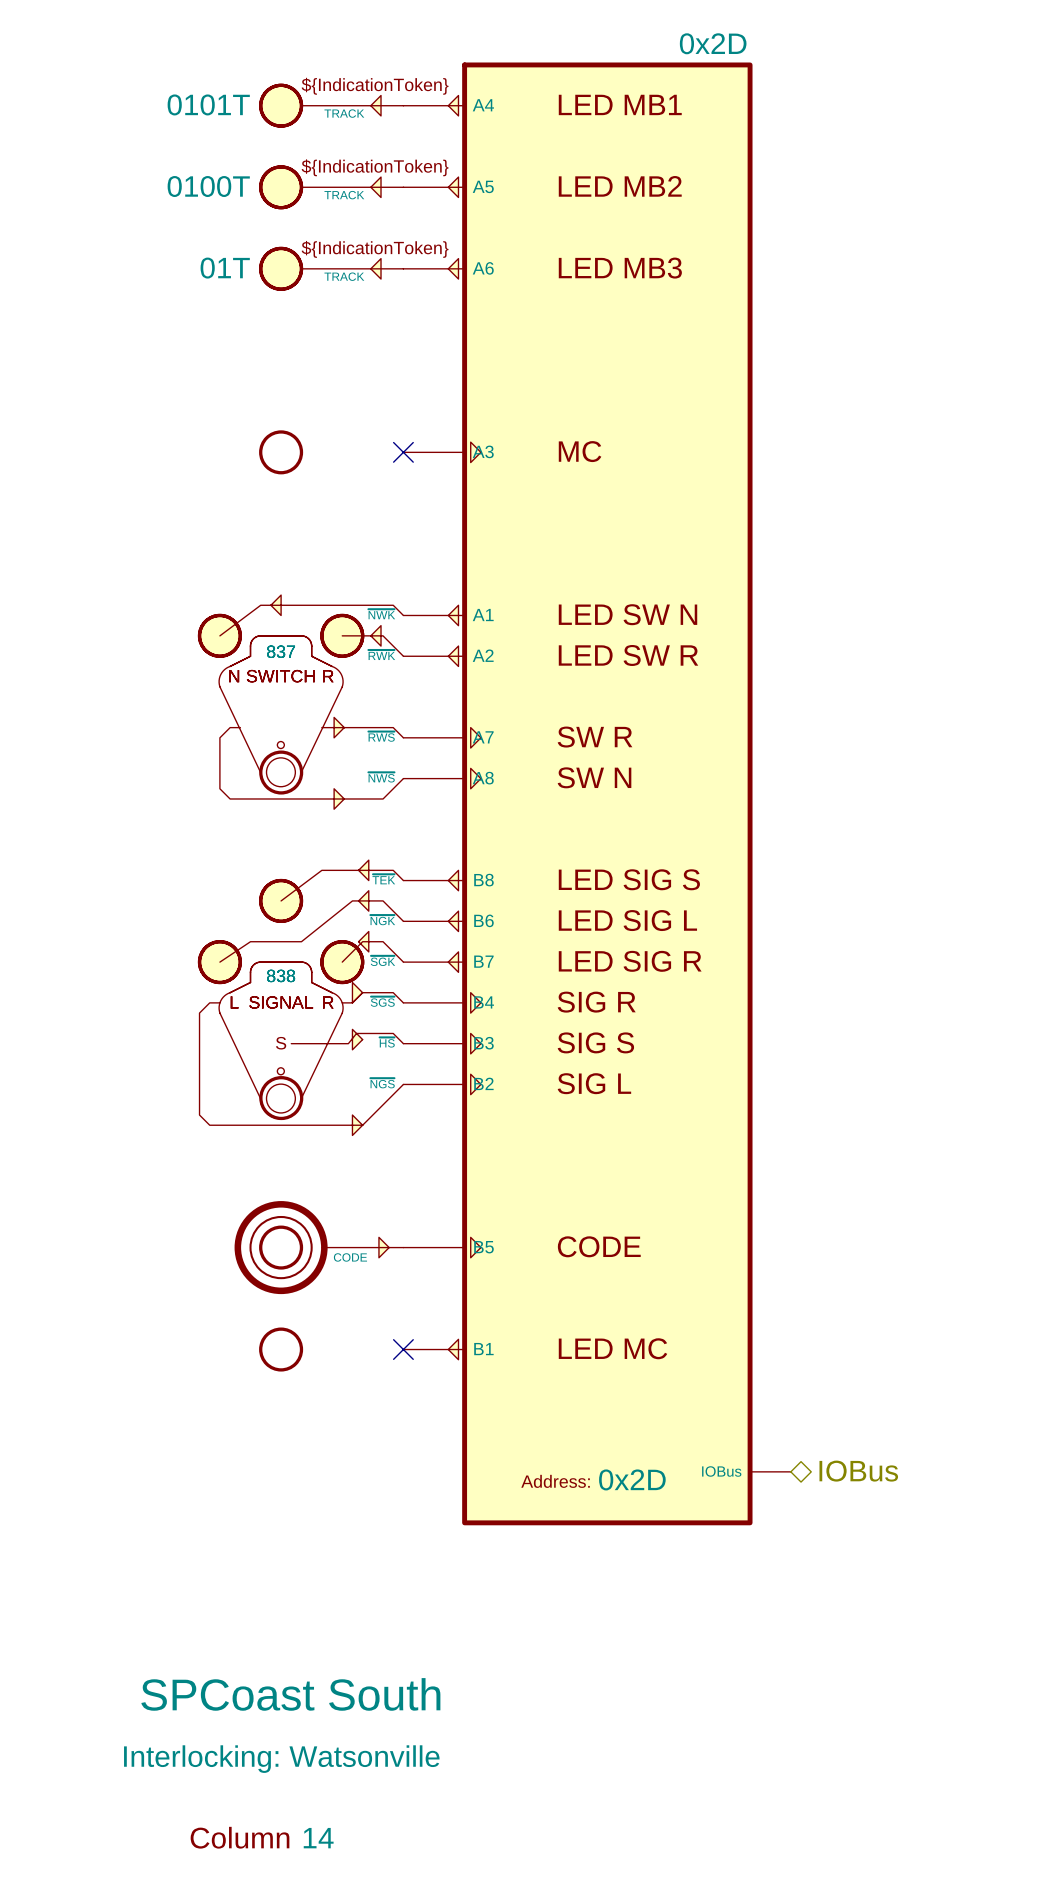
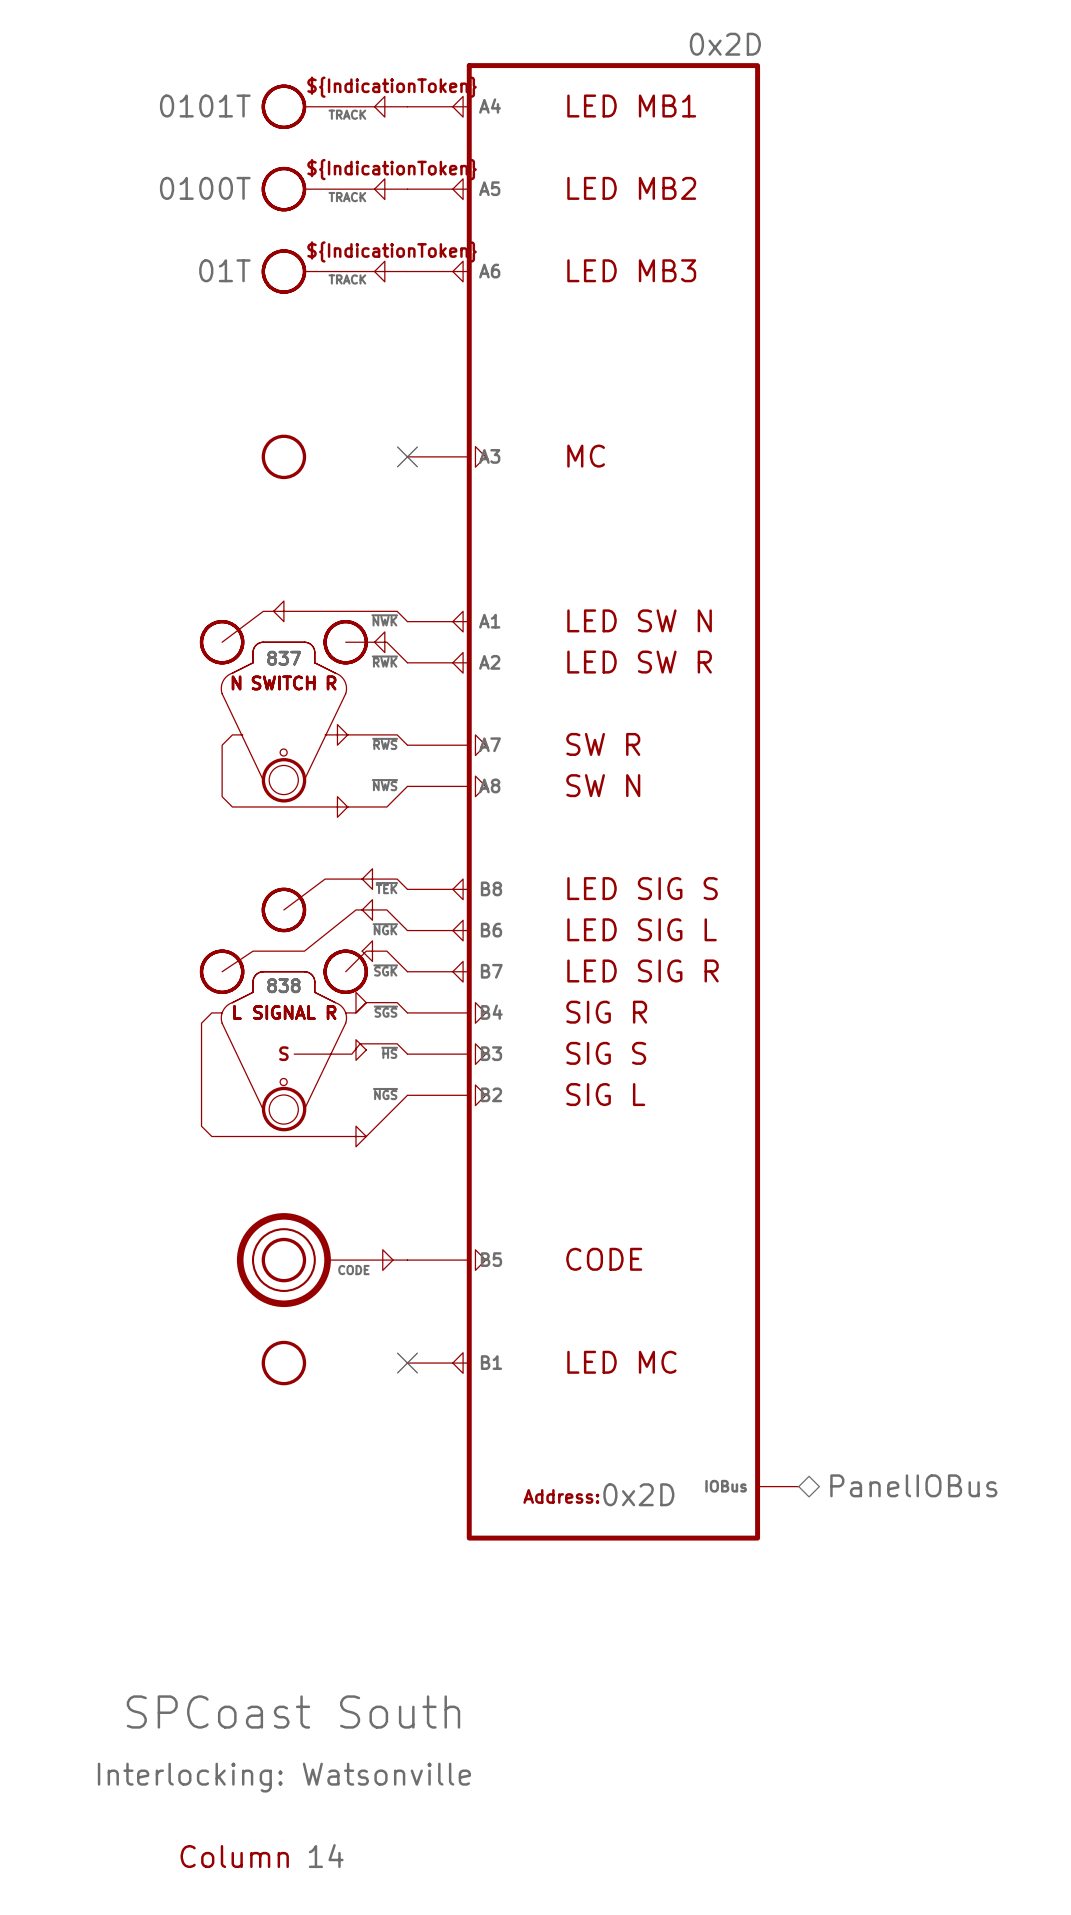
hierarchical label: IOBus (858, 1471) -> PanelIOBus (913, 1485)

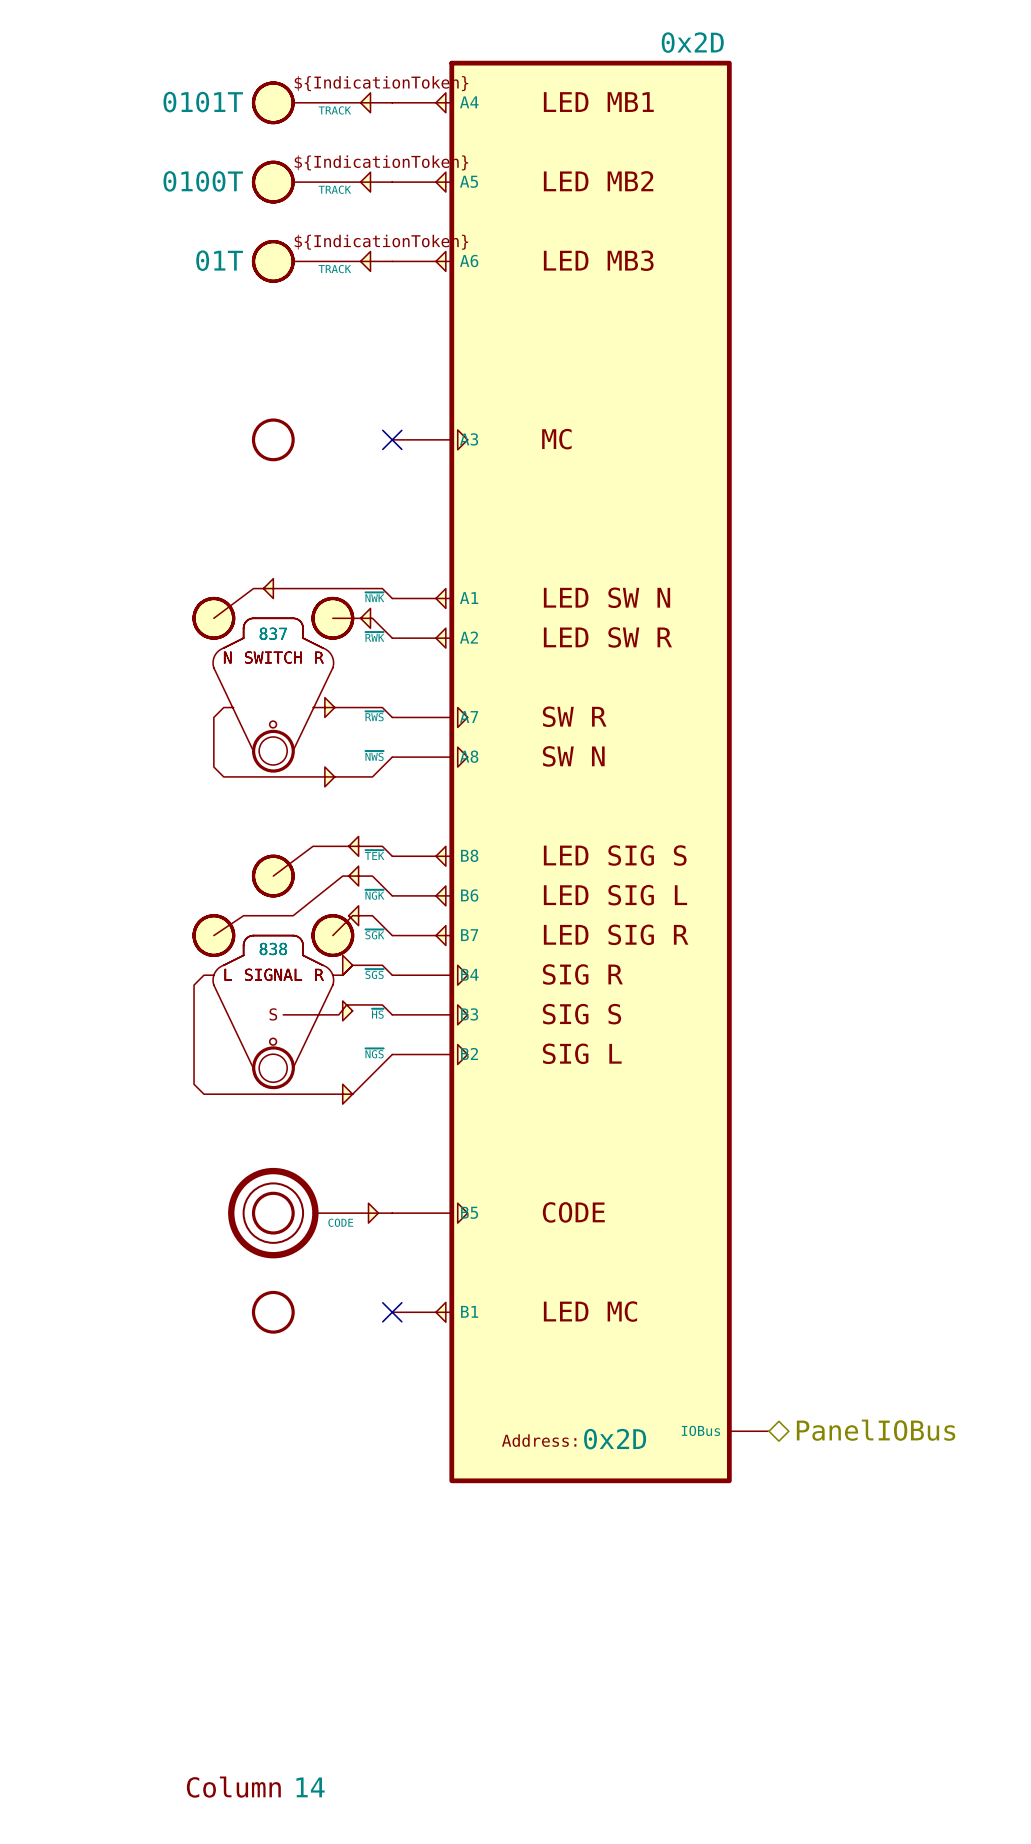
part text: SPCoast South (293, 1711) -> none
part text: Interlocking: Watsonville (284, 1777) -> none

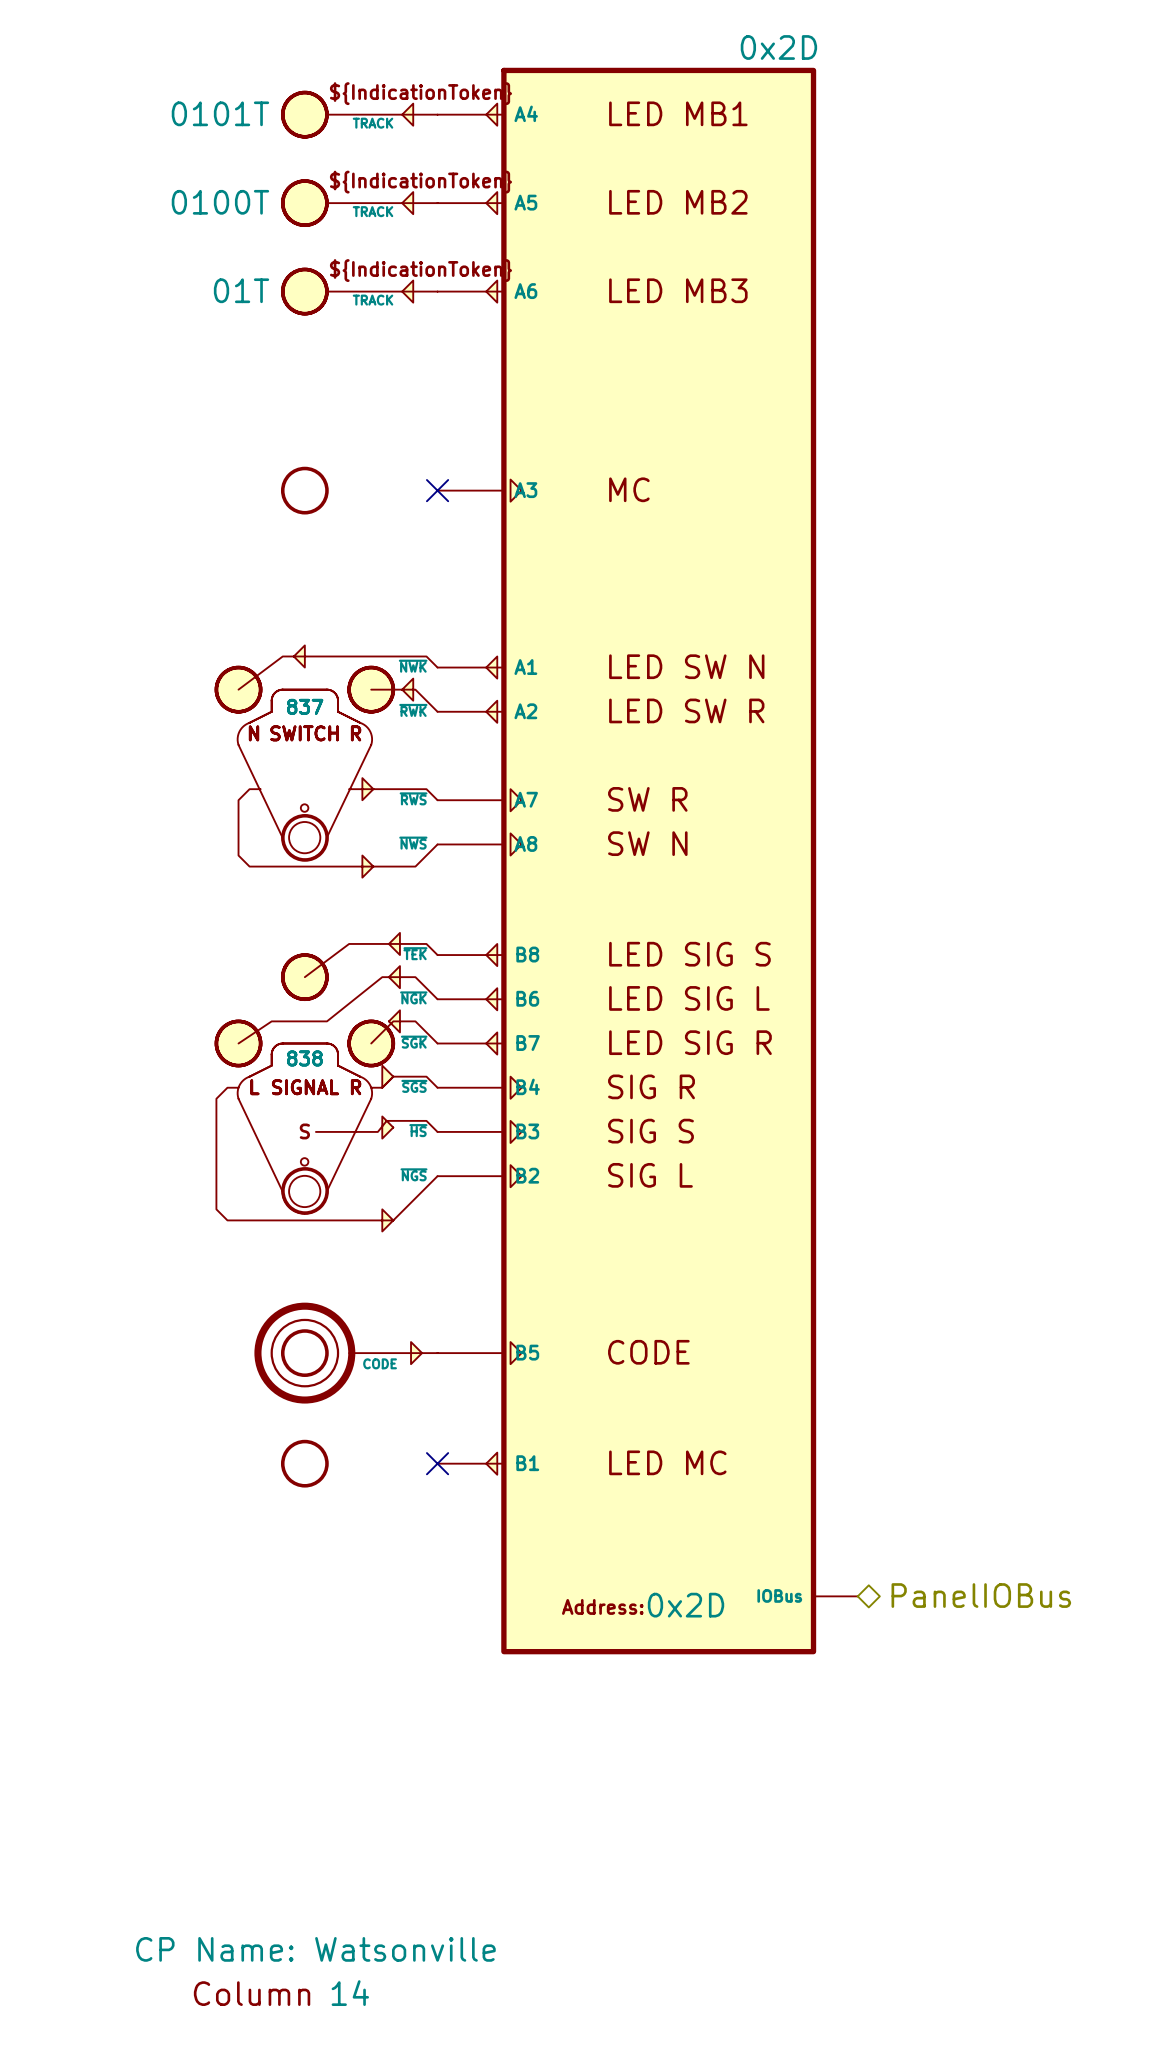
part text: none -> CP Name: Watsonville (315, 1949)

